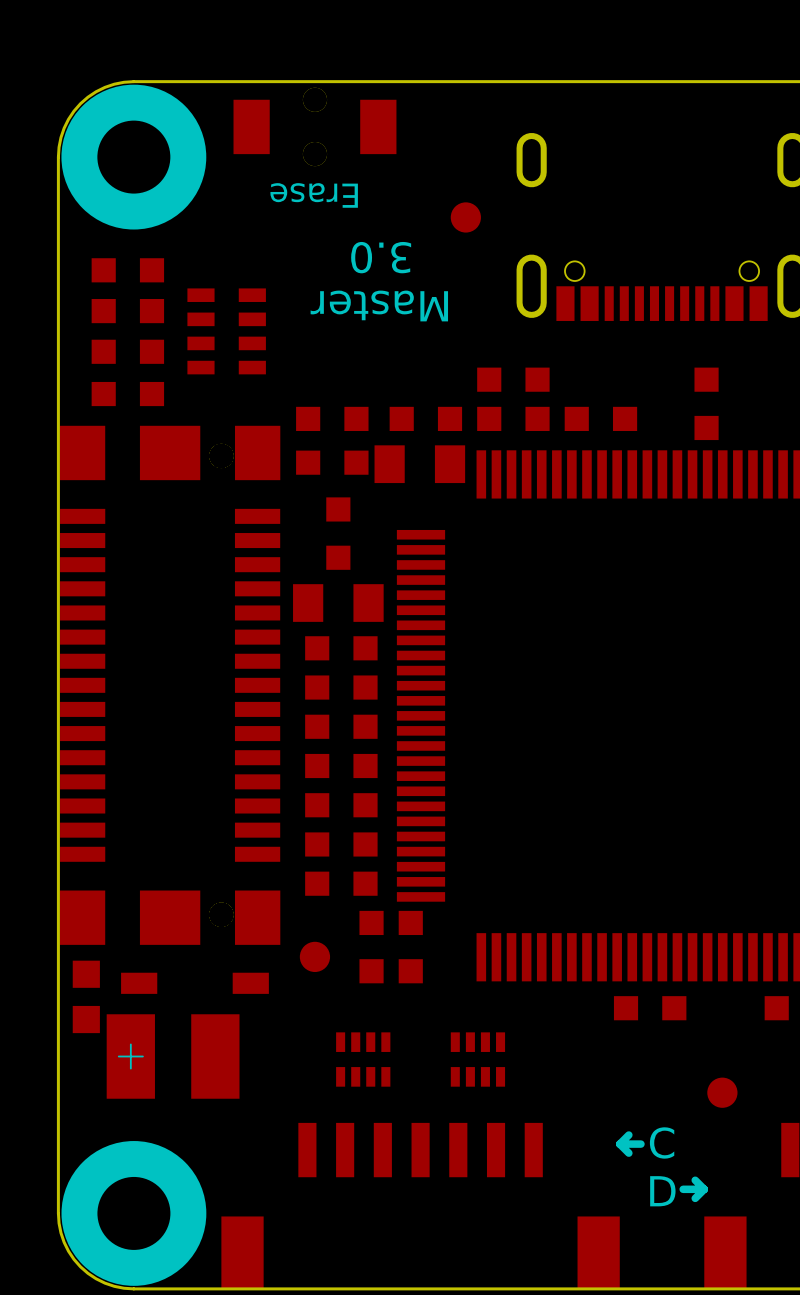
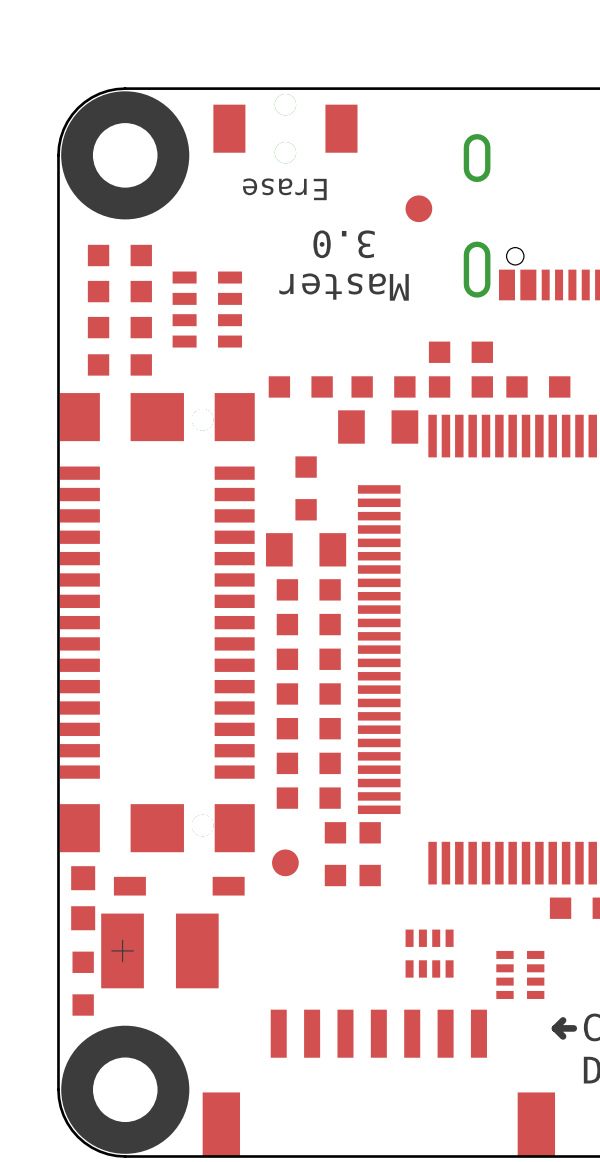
part rotation: 0° (332, 462) -> 90° clockwise (83, 983)
part position: (332, 462) -> (83, 983)
part: (363, 1059) -> none
part: none -> (520, 974)

